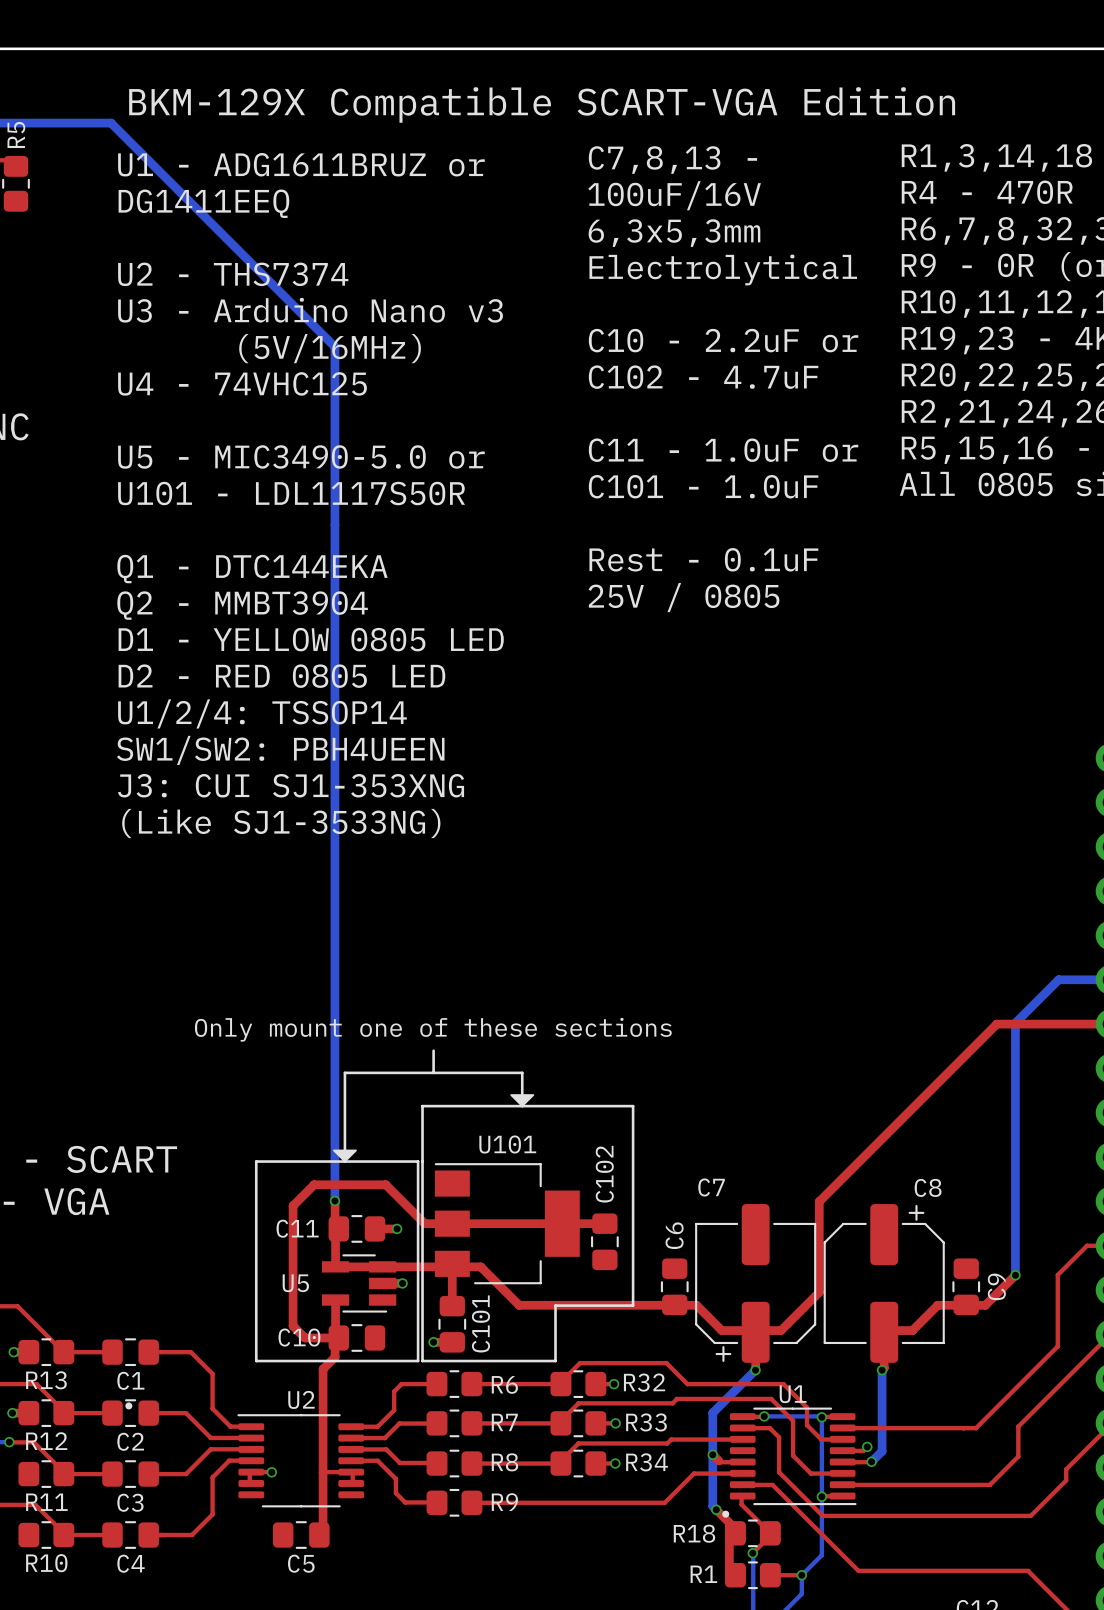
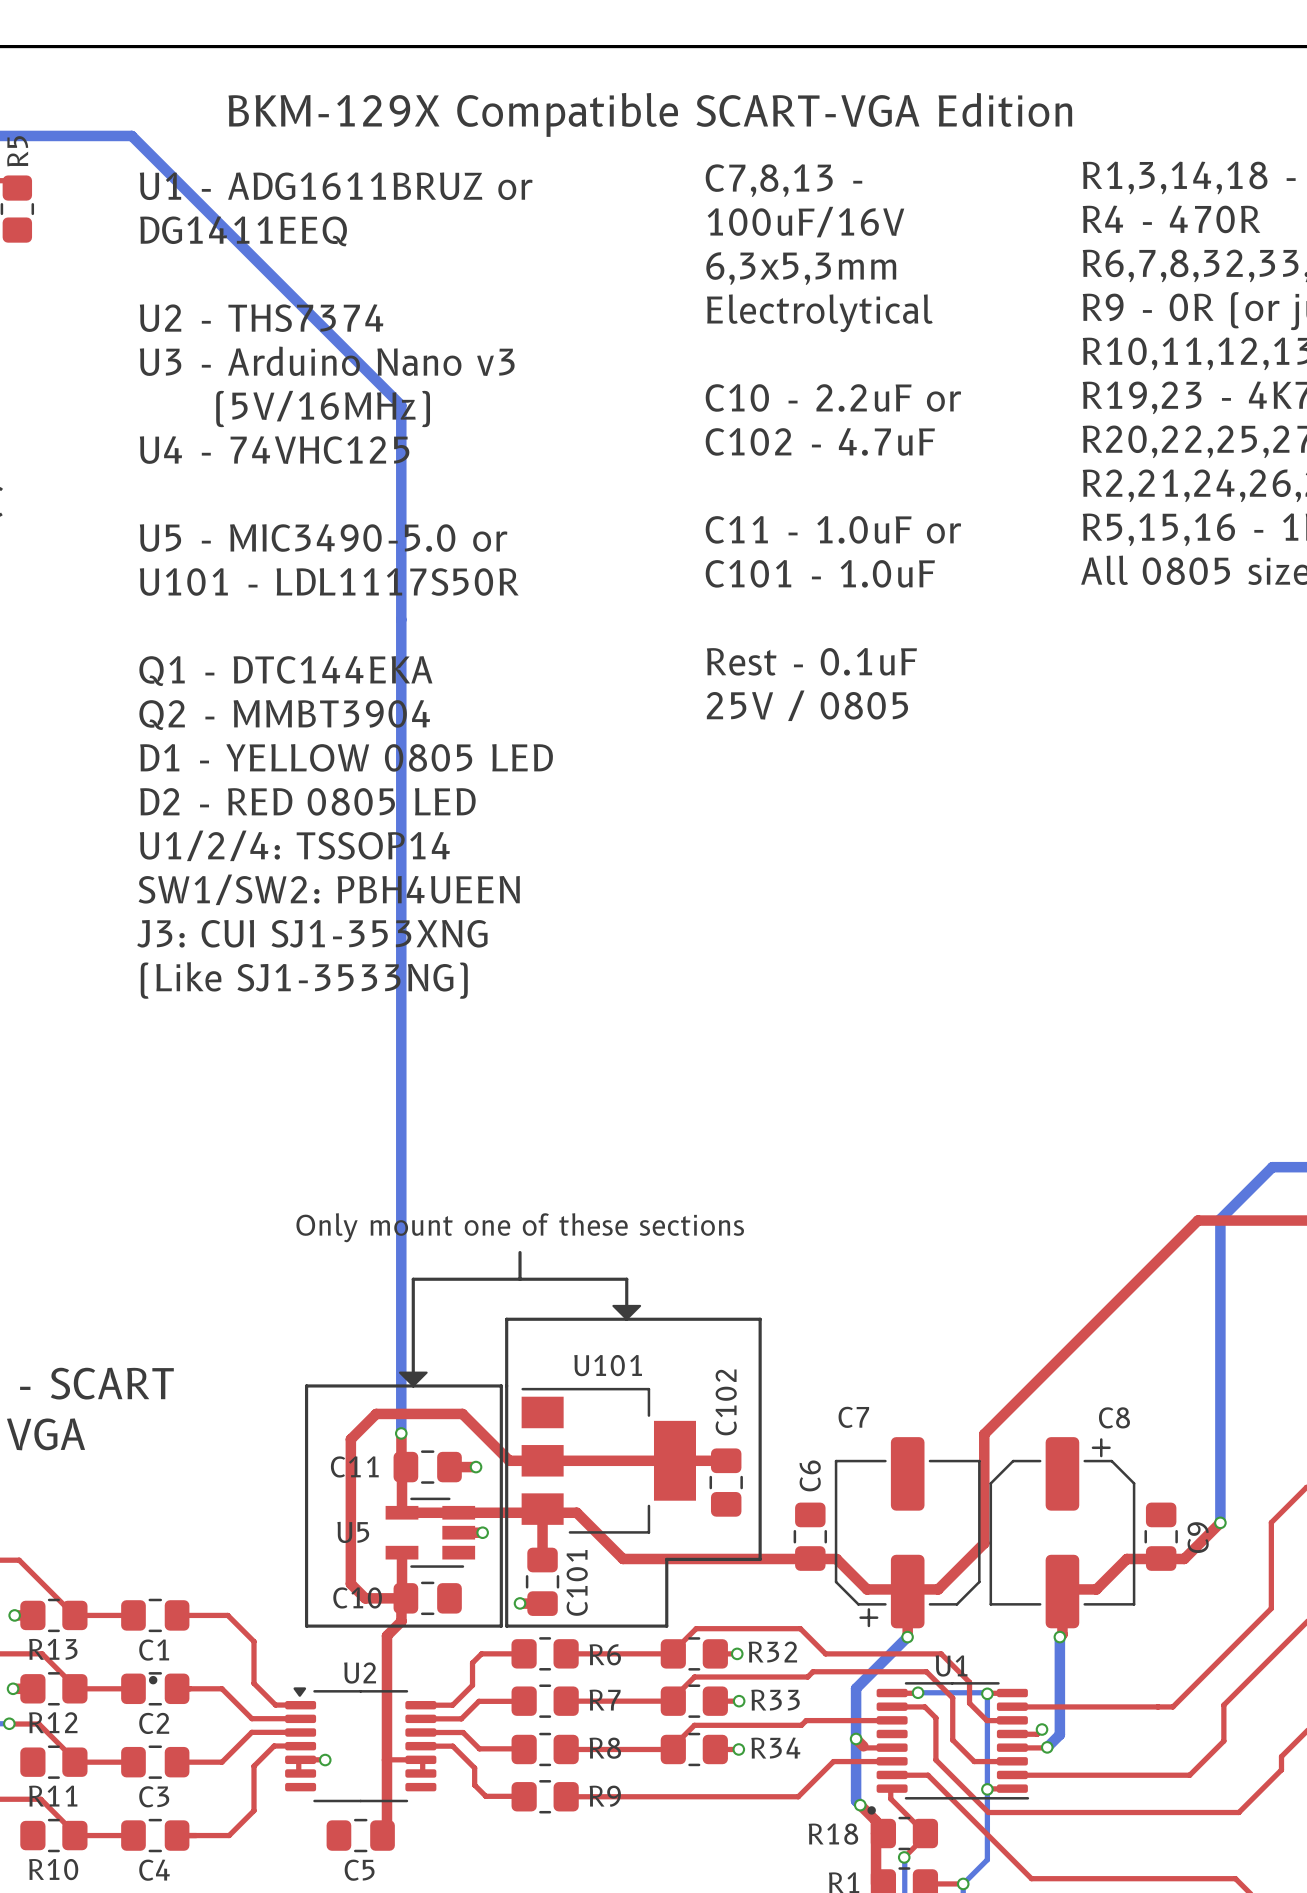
U2 footprint: [237, 1414, 365, 1508] -> [285, 1687, 437, 1803]

